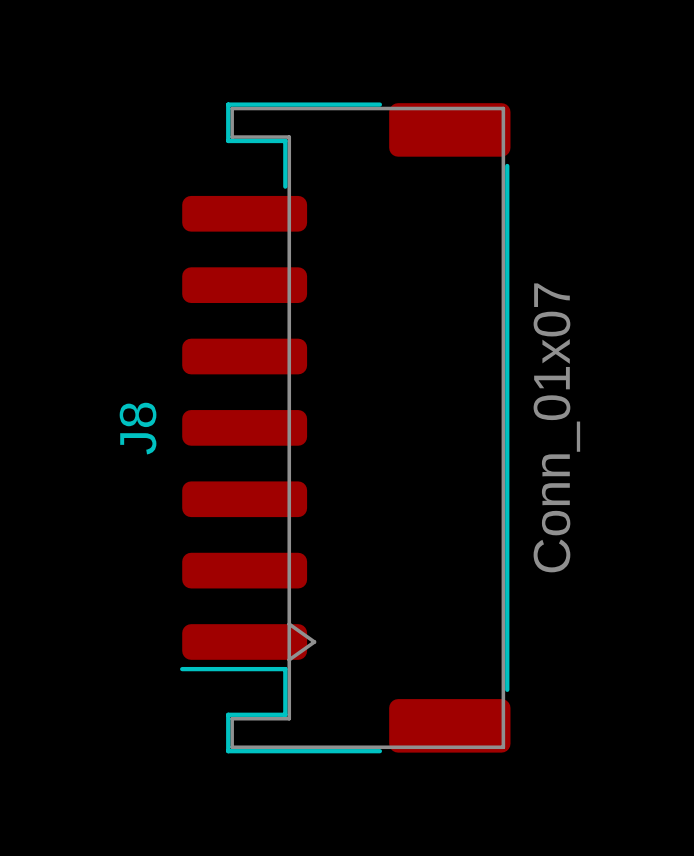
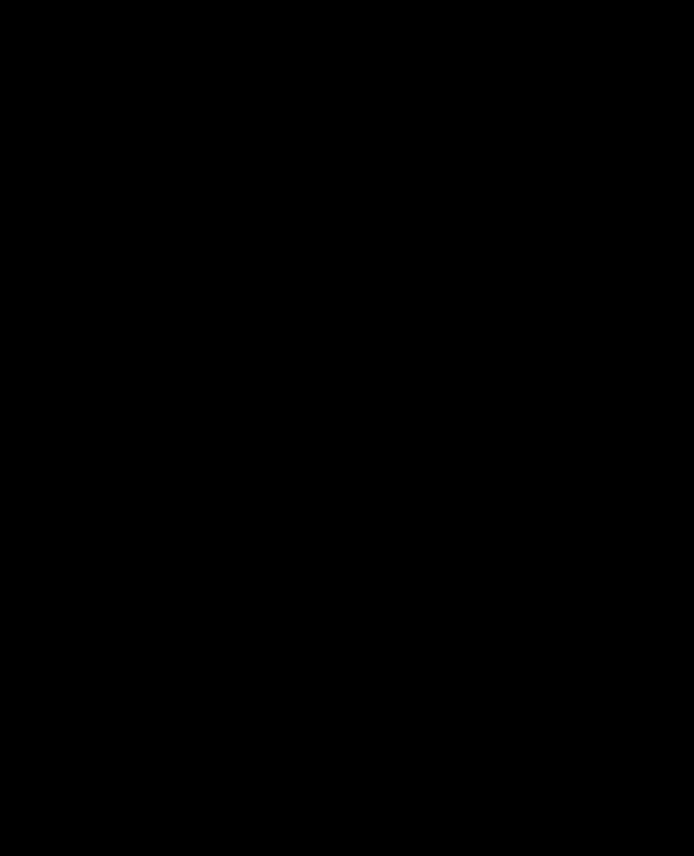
J8: Conn_01x07 (345, 427) -> none

